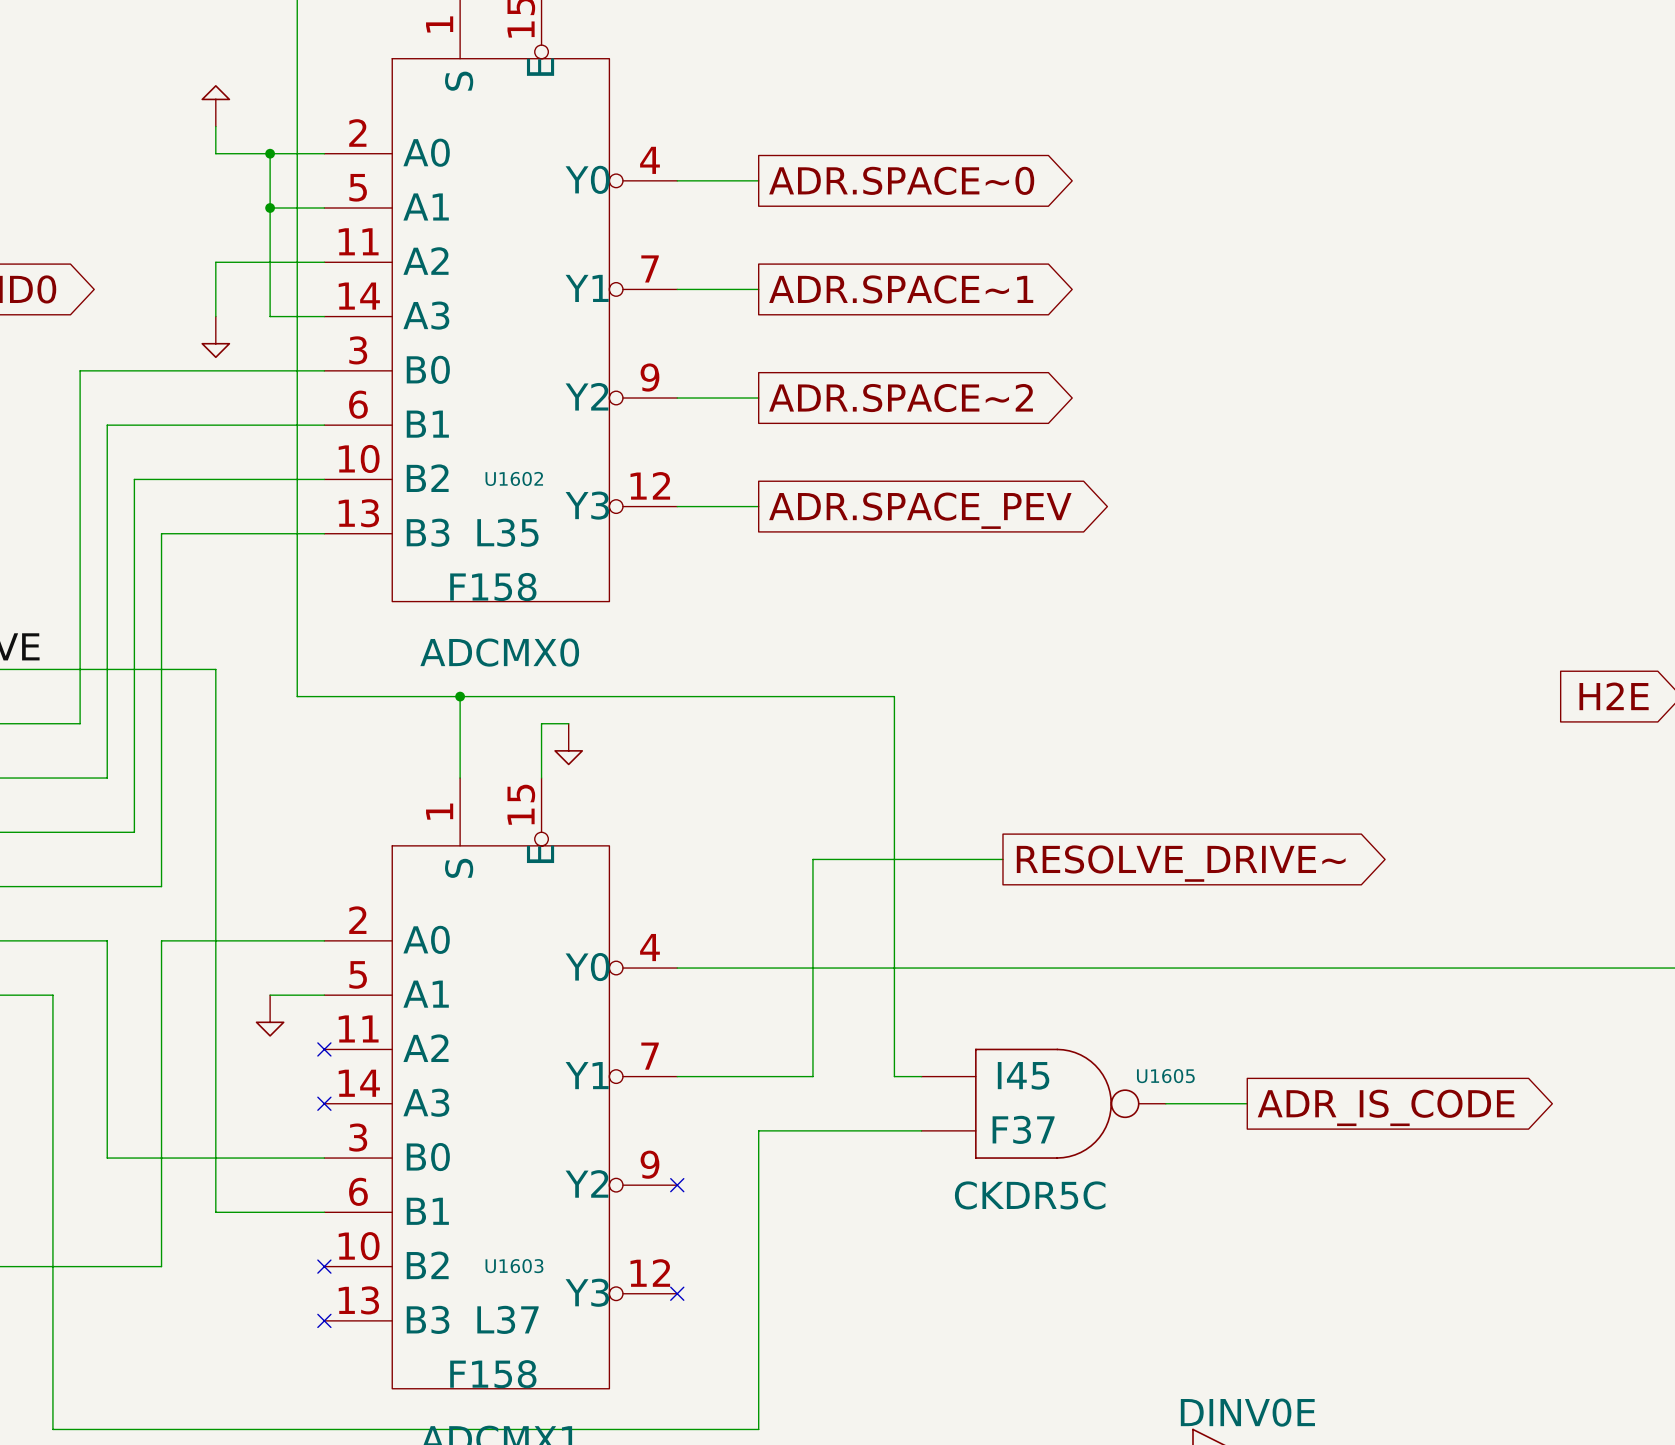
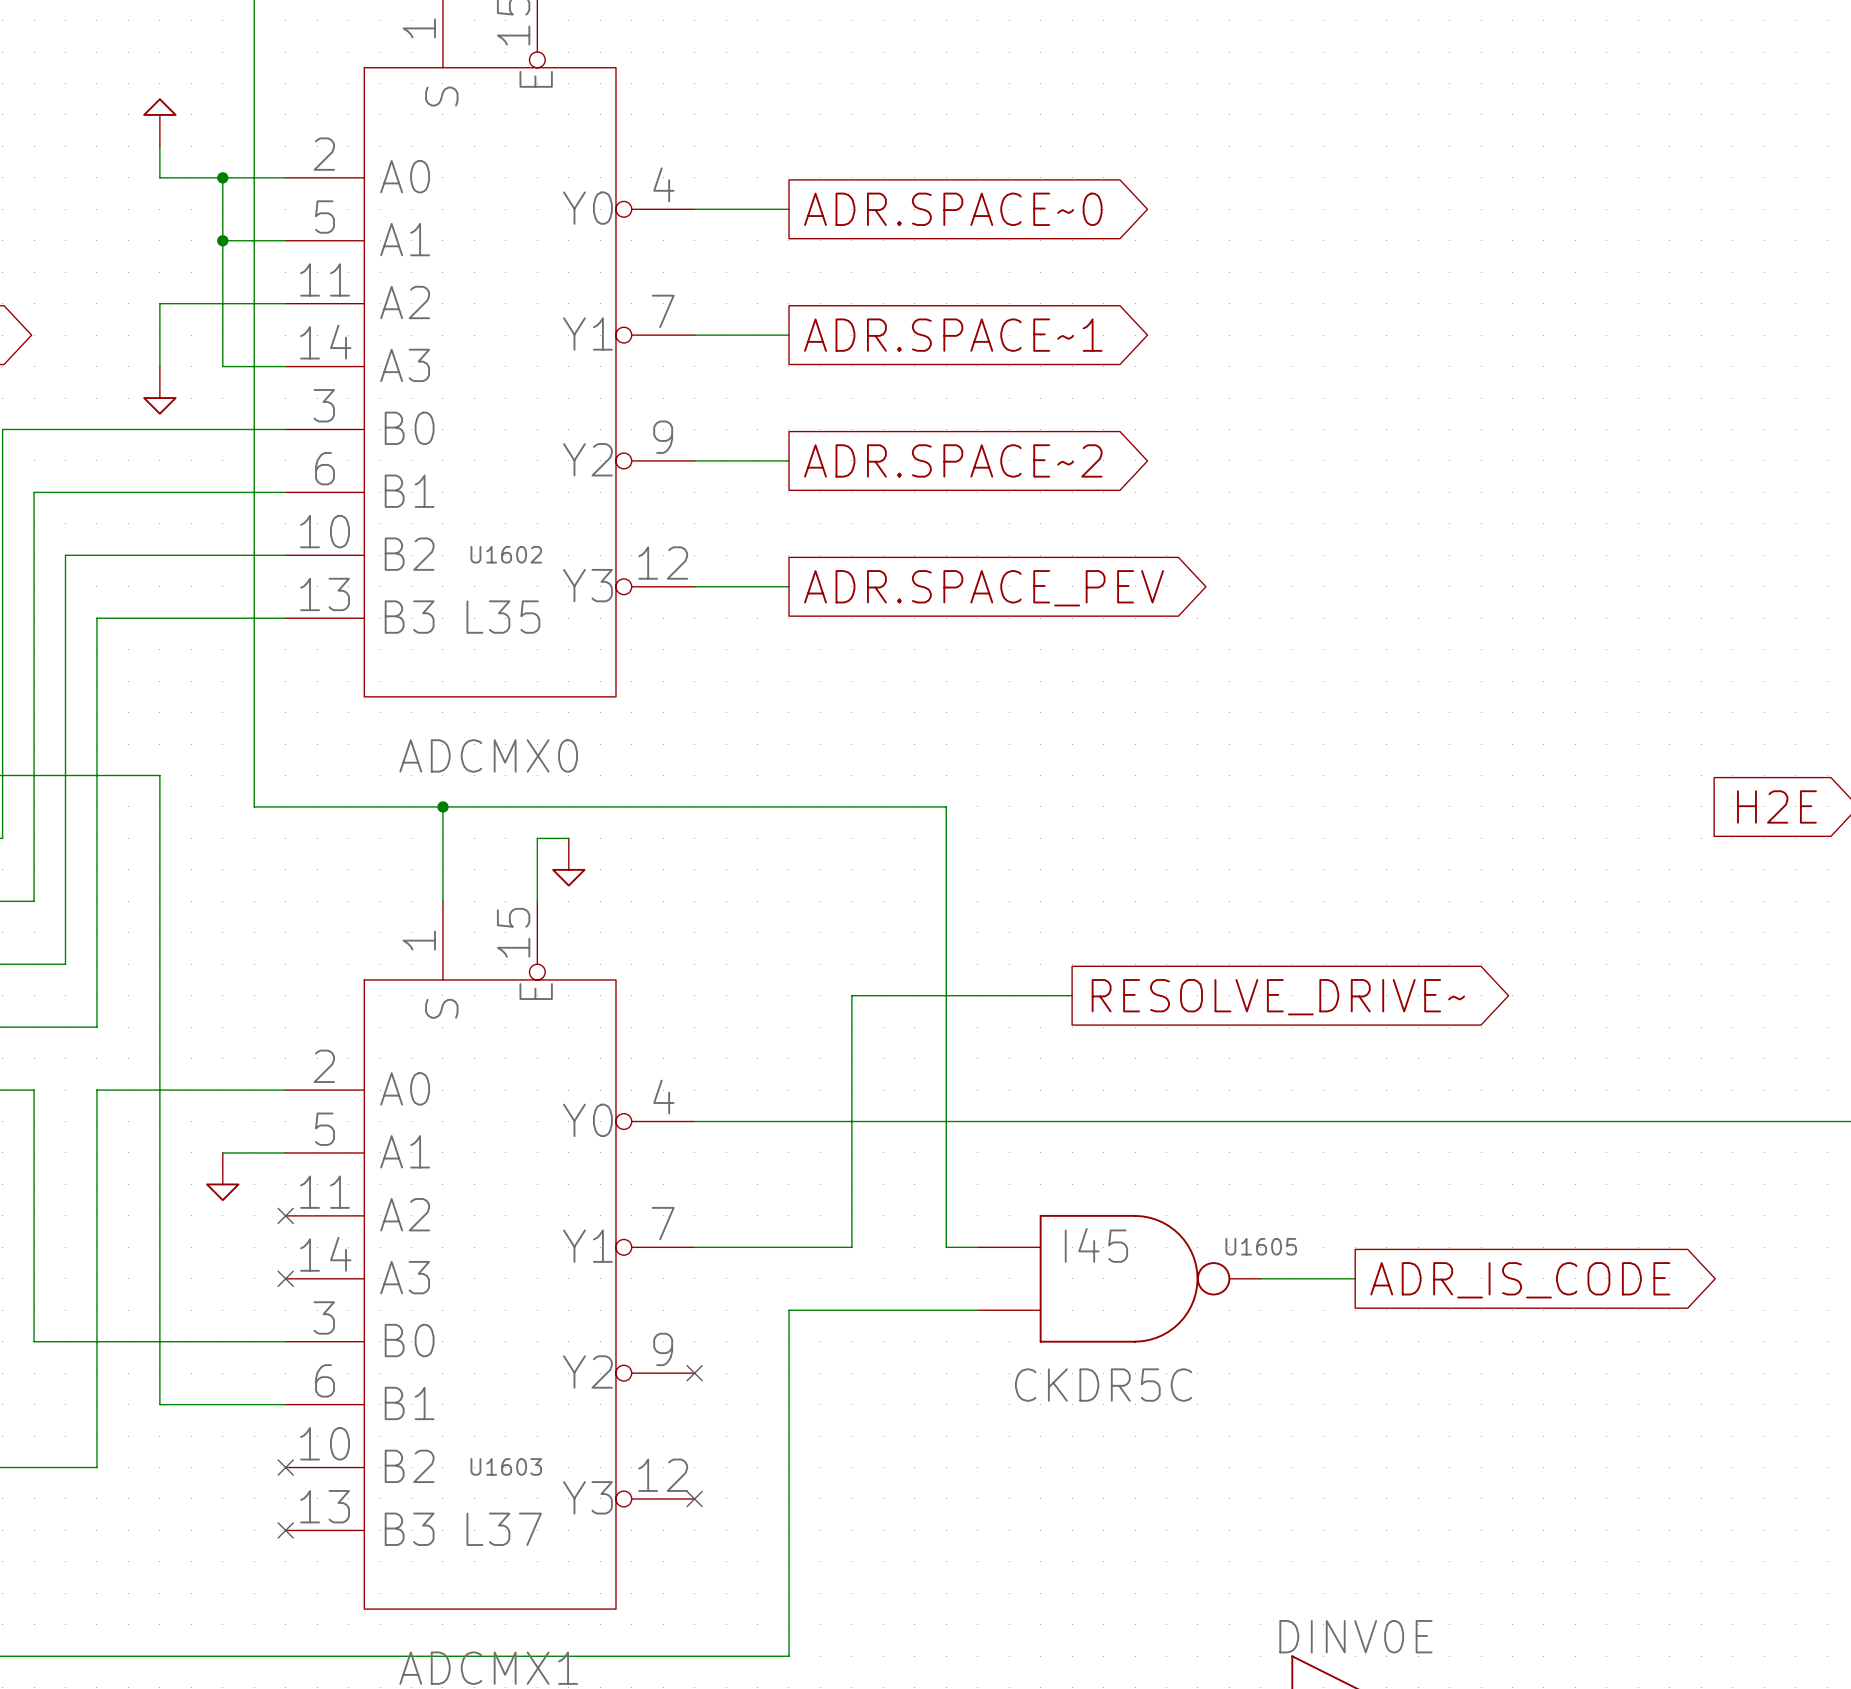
U1602 value: F158 (493, 587) -> none
U1605 value: F37 (1023, 1129) -> none
U1603 value: F158 (493, 1374) -> none

